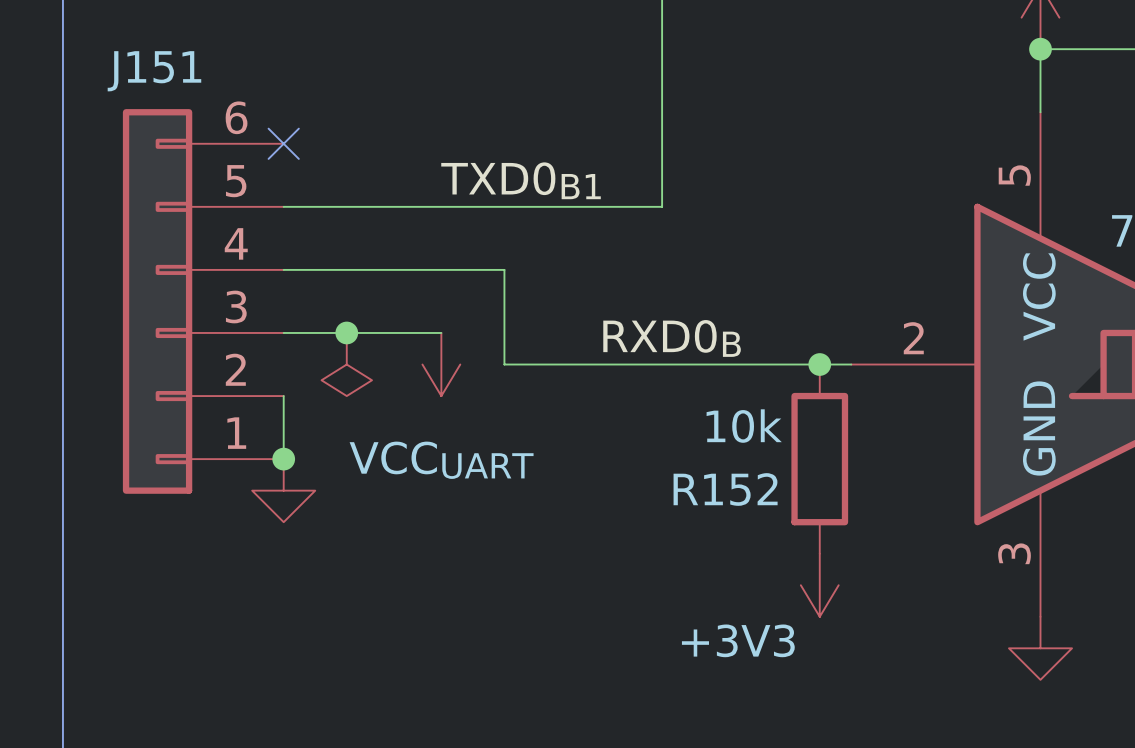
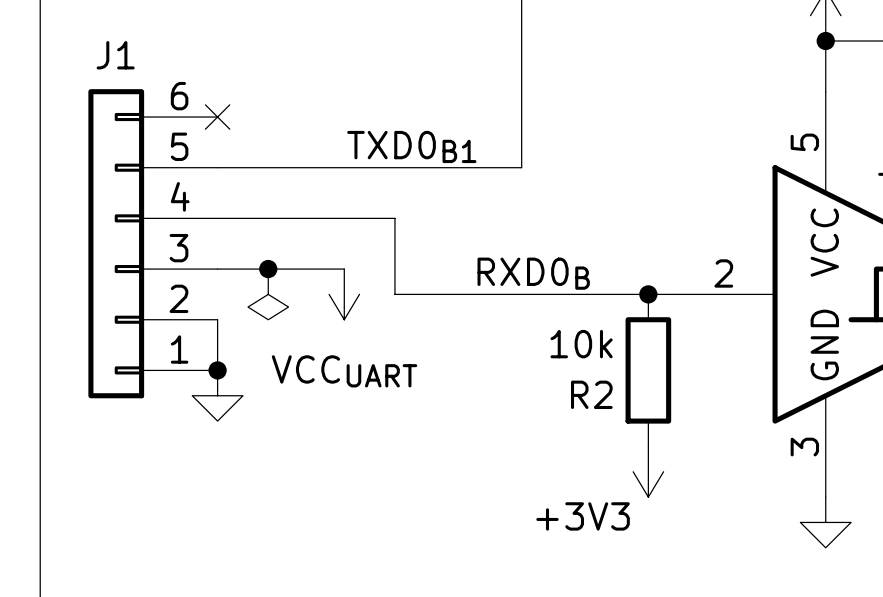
J151 name: J151 (154, 71) -> J1 (115, 55)
R152 name: R152 (725, 489) -> R2 (591, 394)

